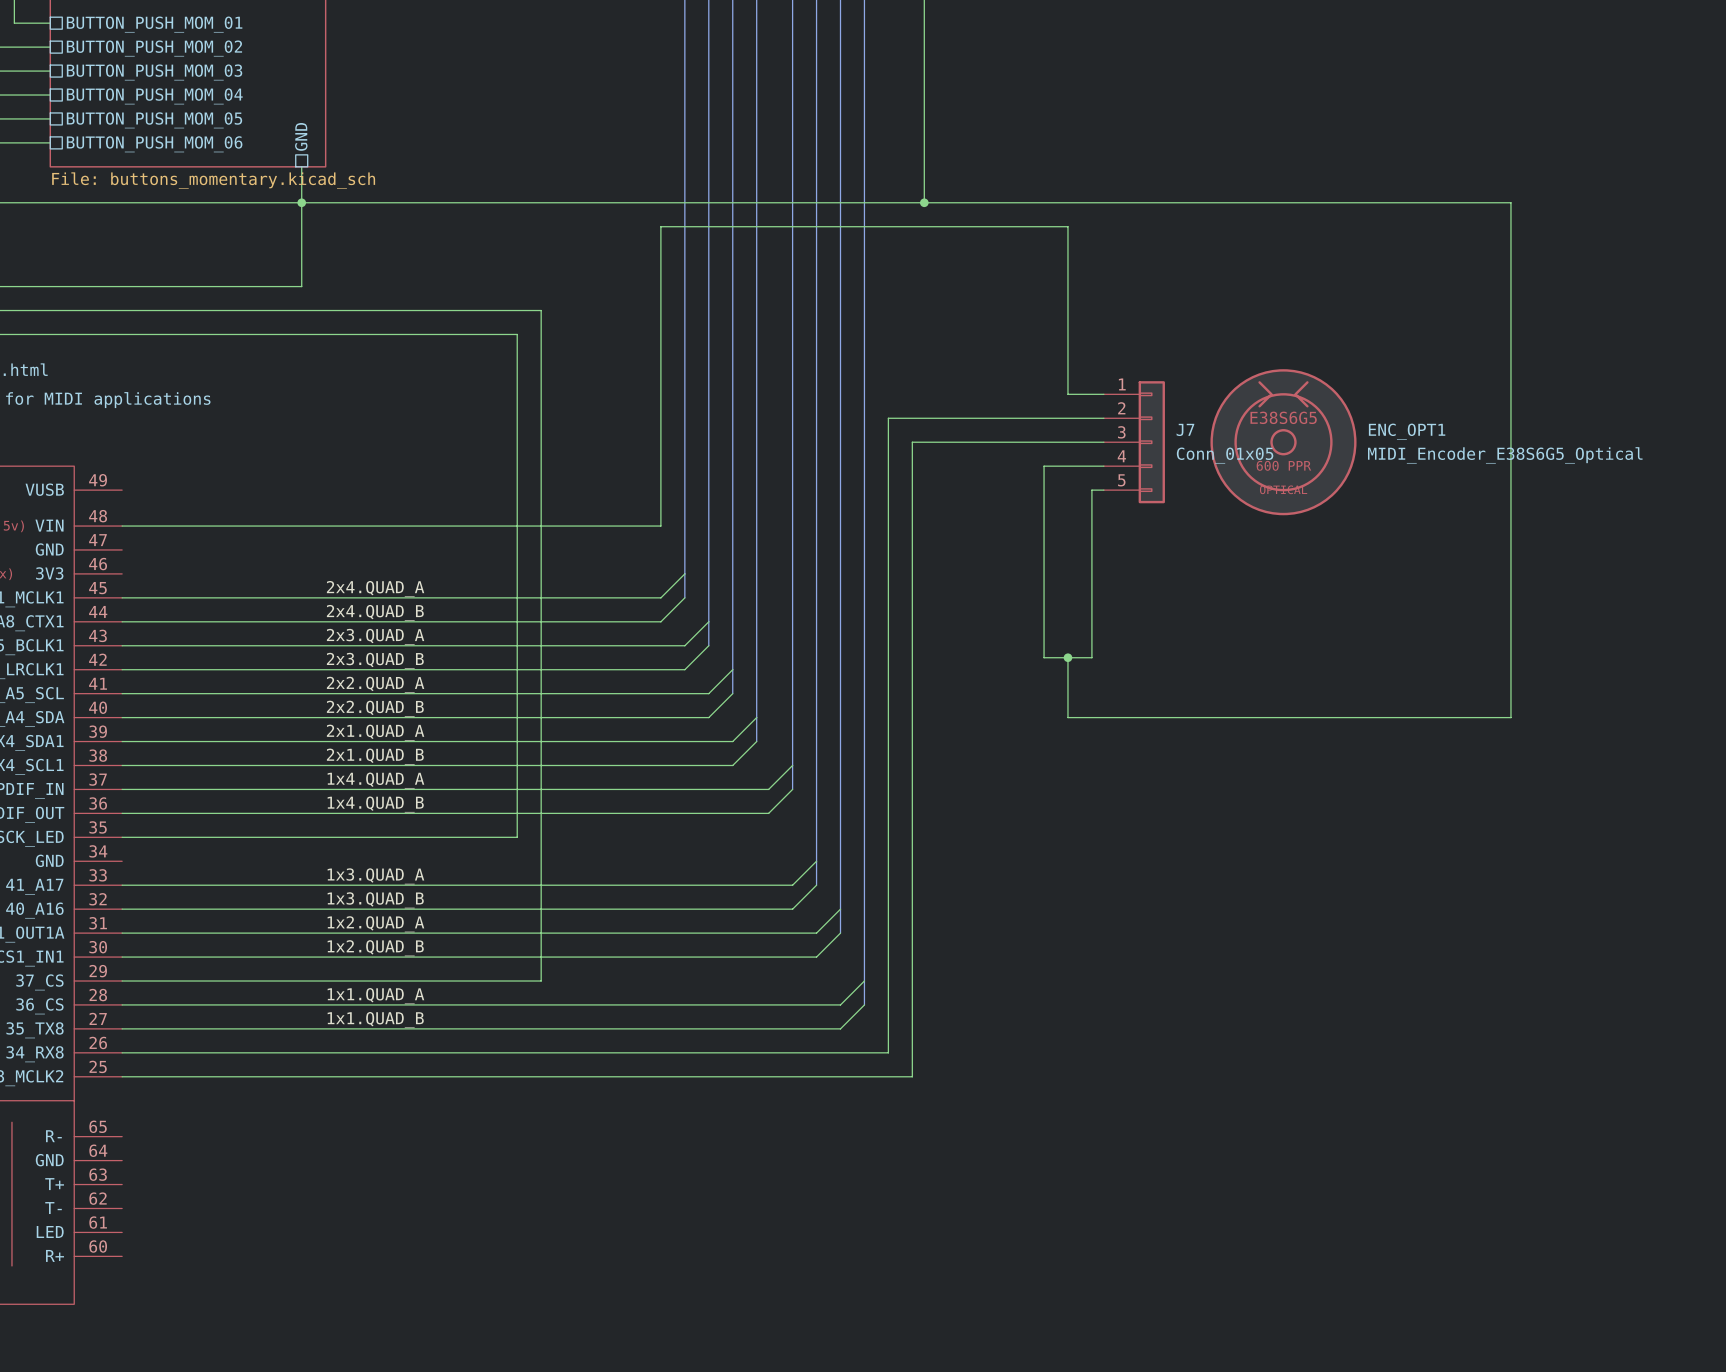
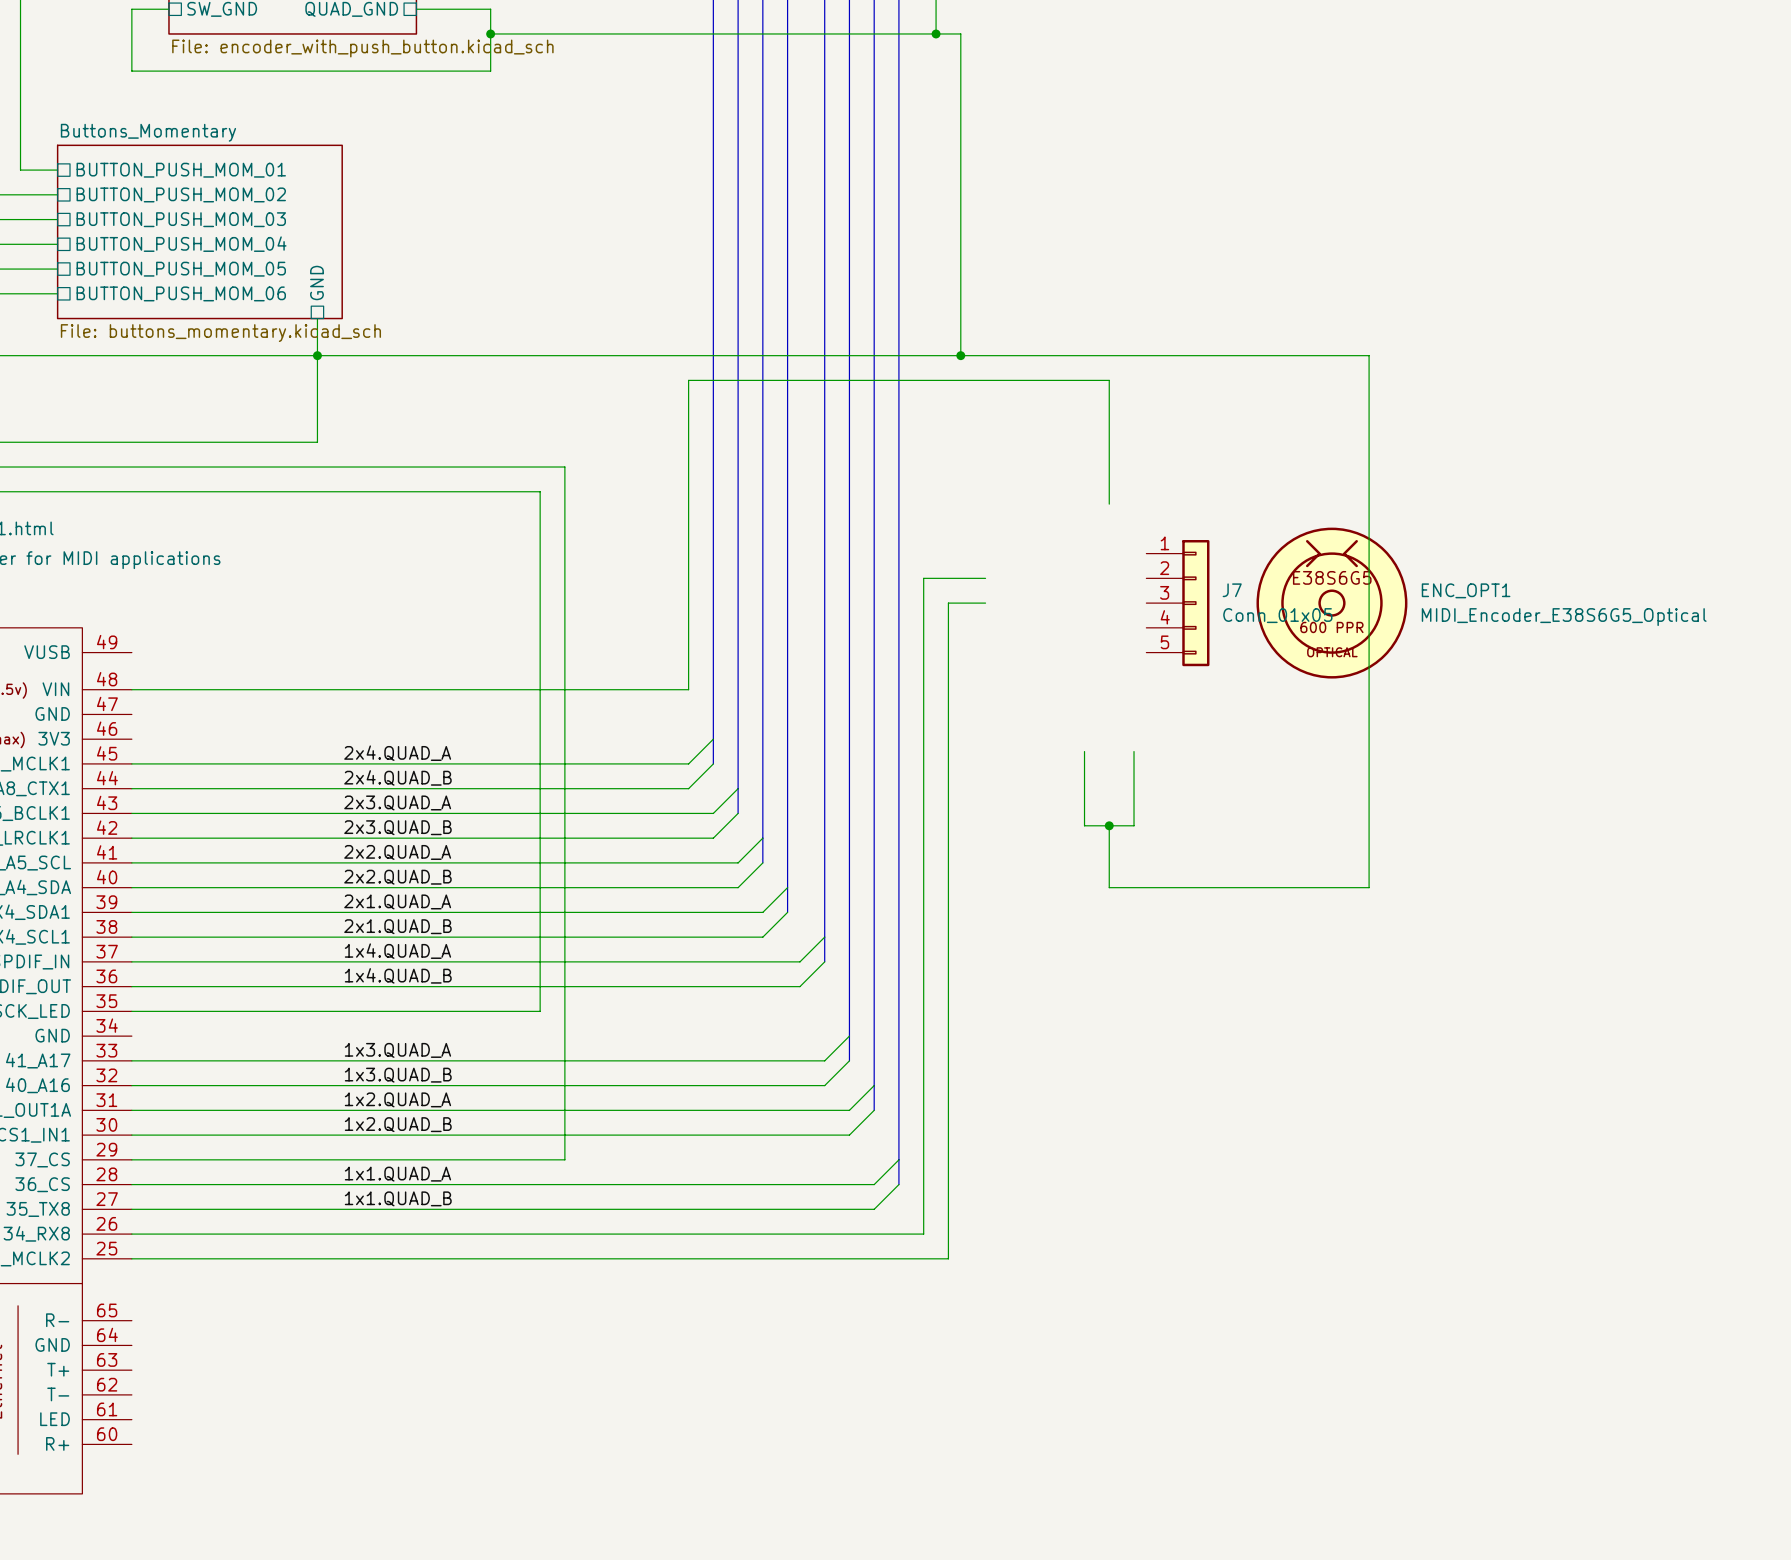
wire: (1319, 202) (1510, 202) (1510, 717) (1319, 717) -> (1369, 355) (1369, 887)
wire: (1067, 346) (1067, 394) (1103, 394) -> none
wire: (948, 418) (1103, 418) -> none
wire: (948, 442) (1103, 442) -> none
wire: (1103, 466) (1044, 466) (1044, 585) -> none
wire: (1103, 490) (1091, 490) (1091, 585) -> none

